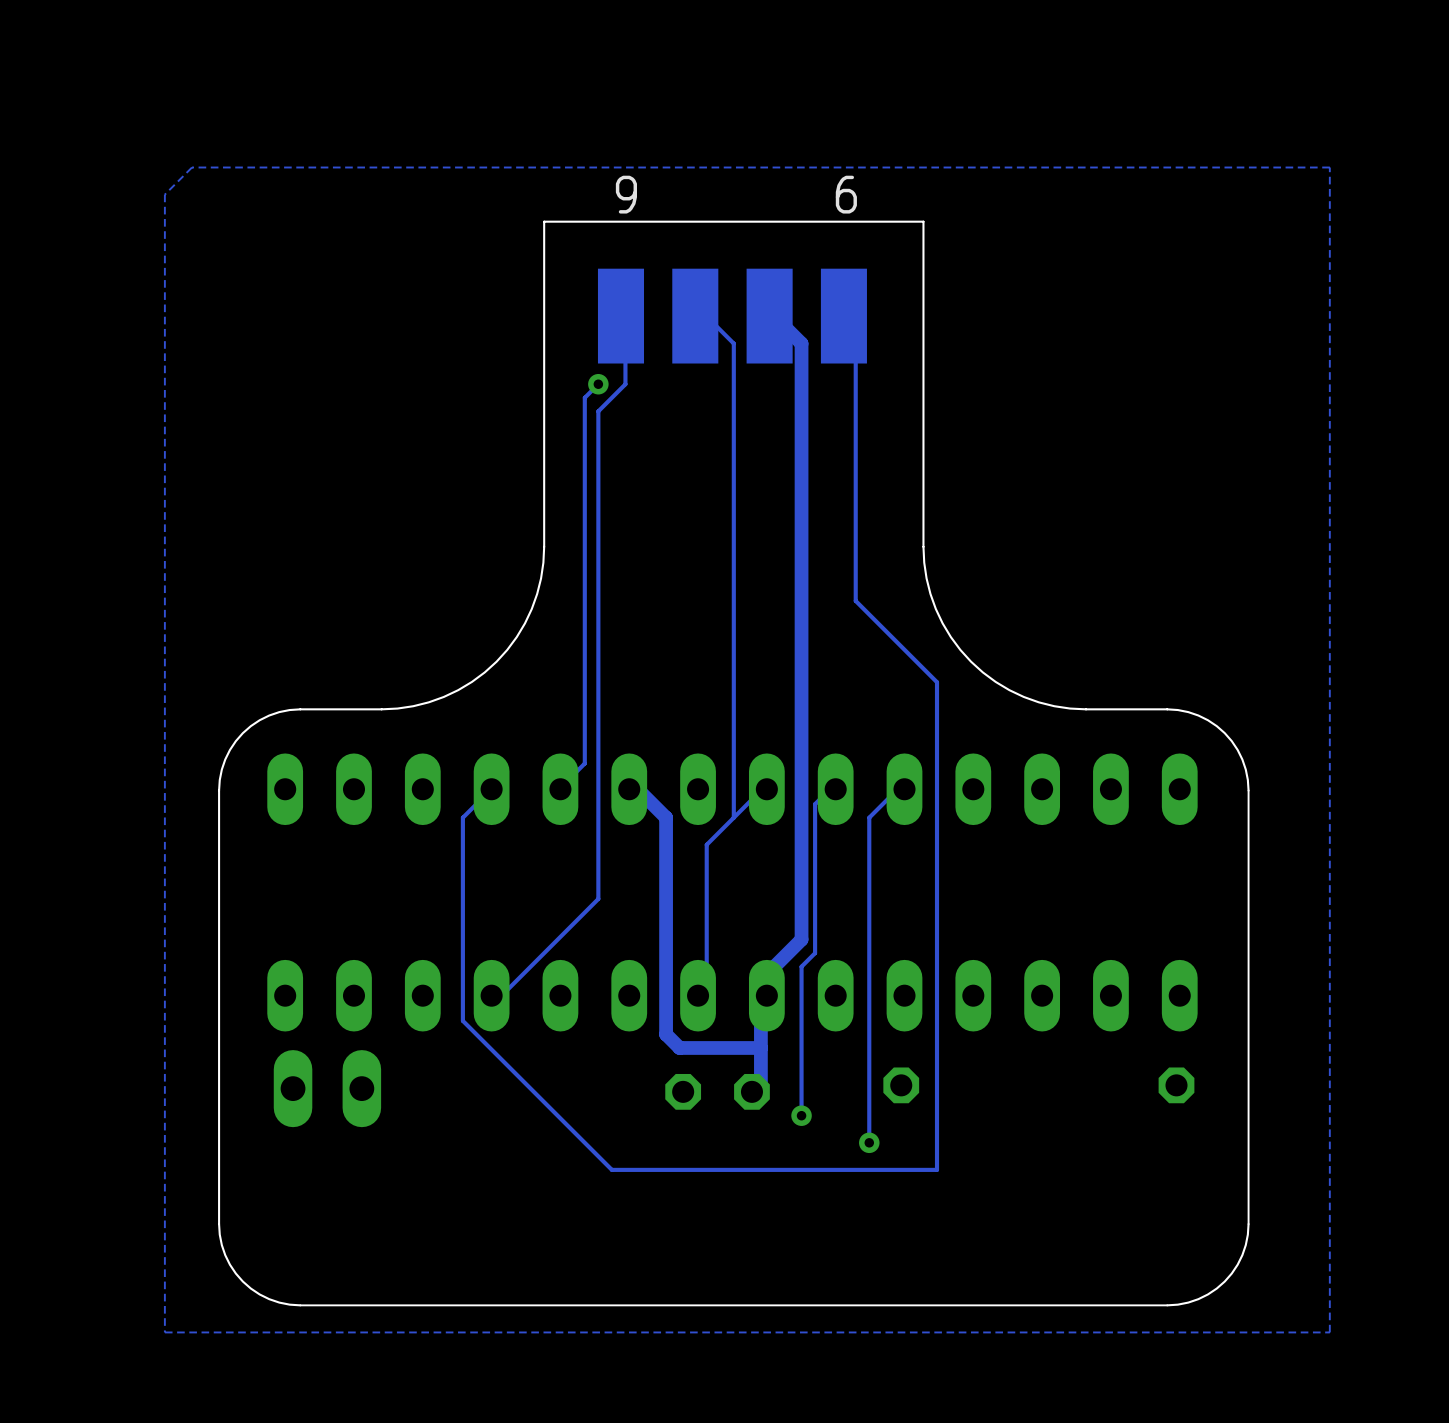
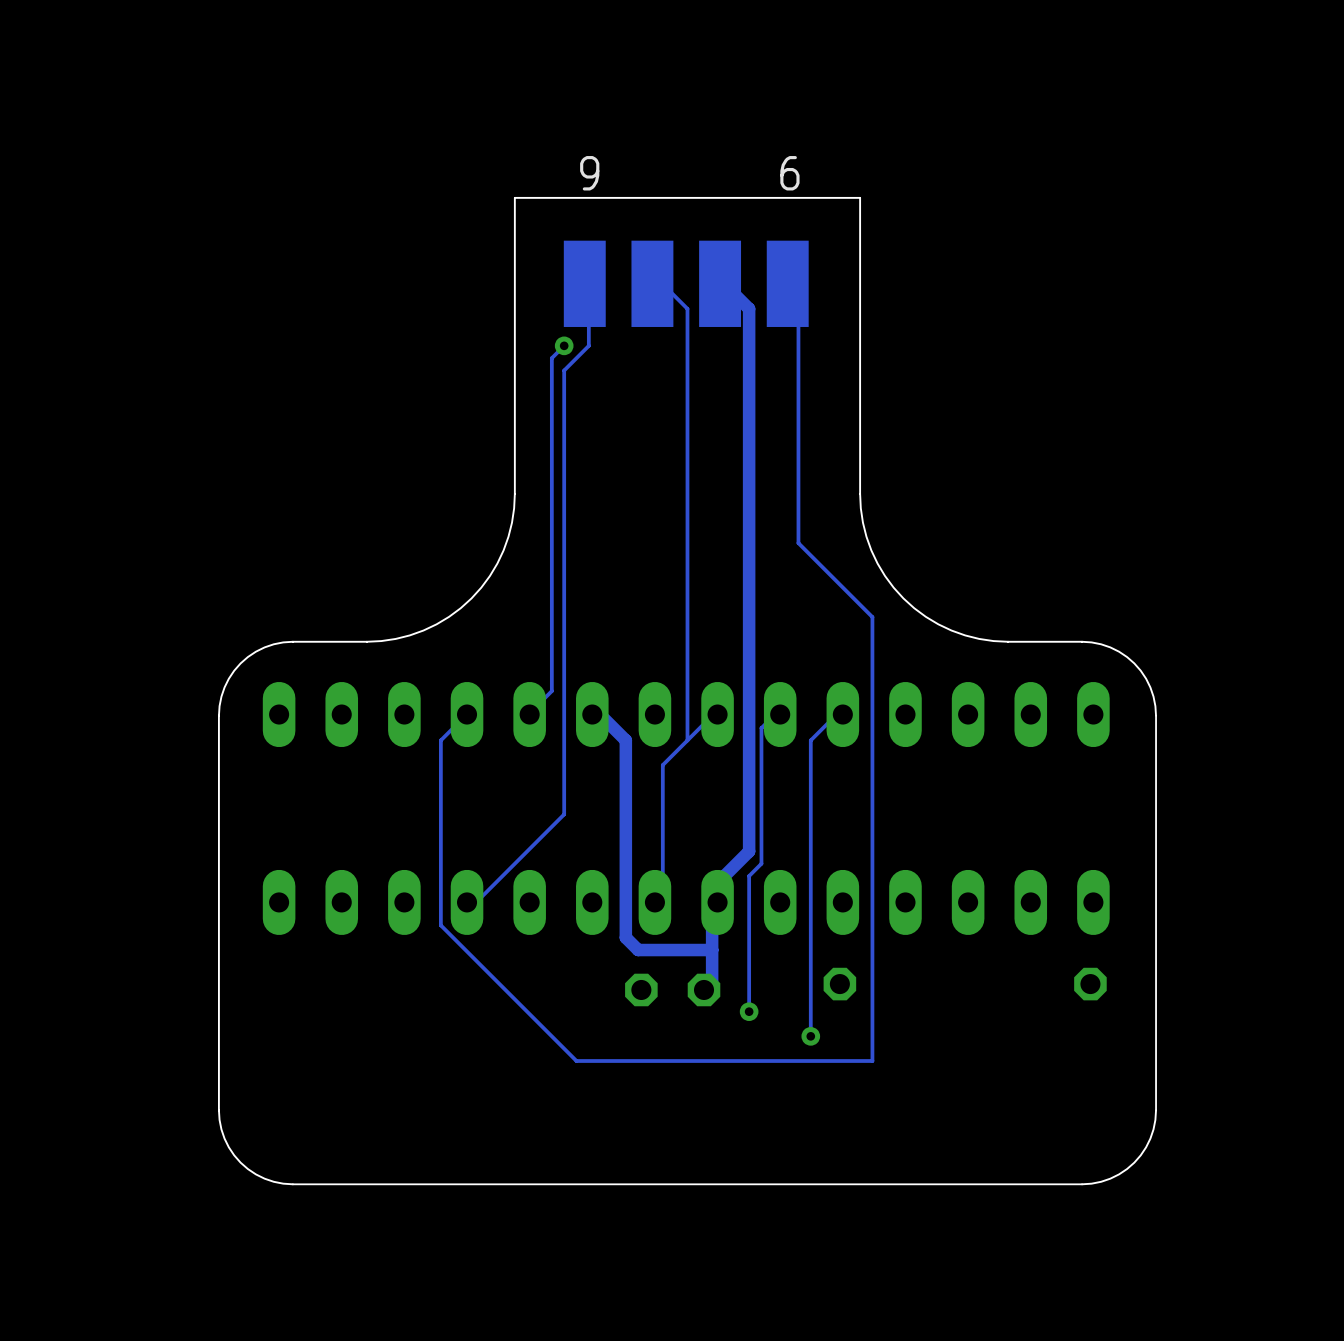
zone outline: (1329, 167) (191, 167) (164, 194) (164, 1332) (1329, 1332) (1329, 167) -> none
part: (327, 1088) -> none

